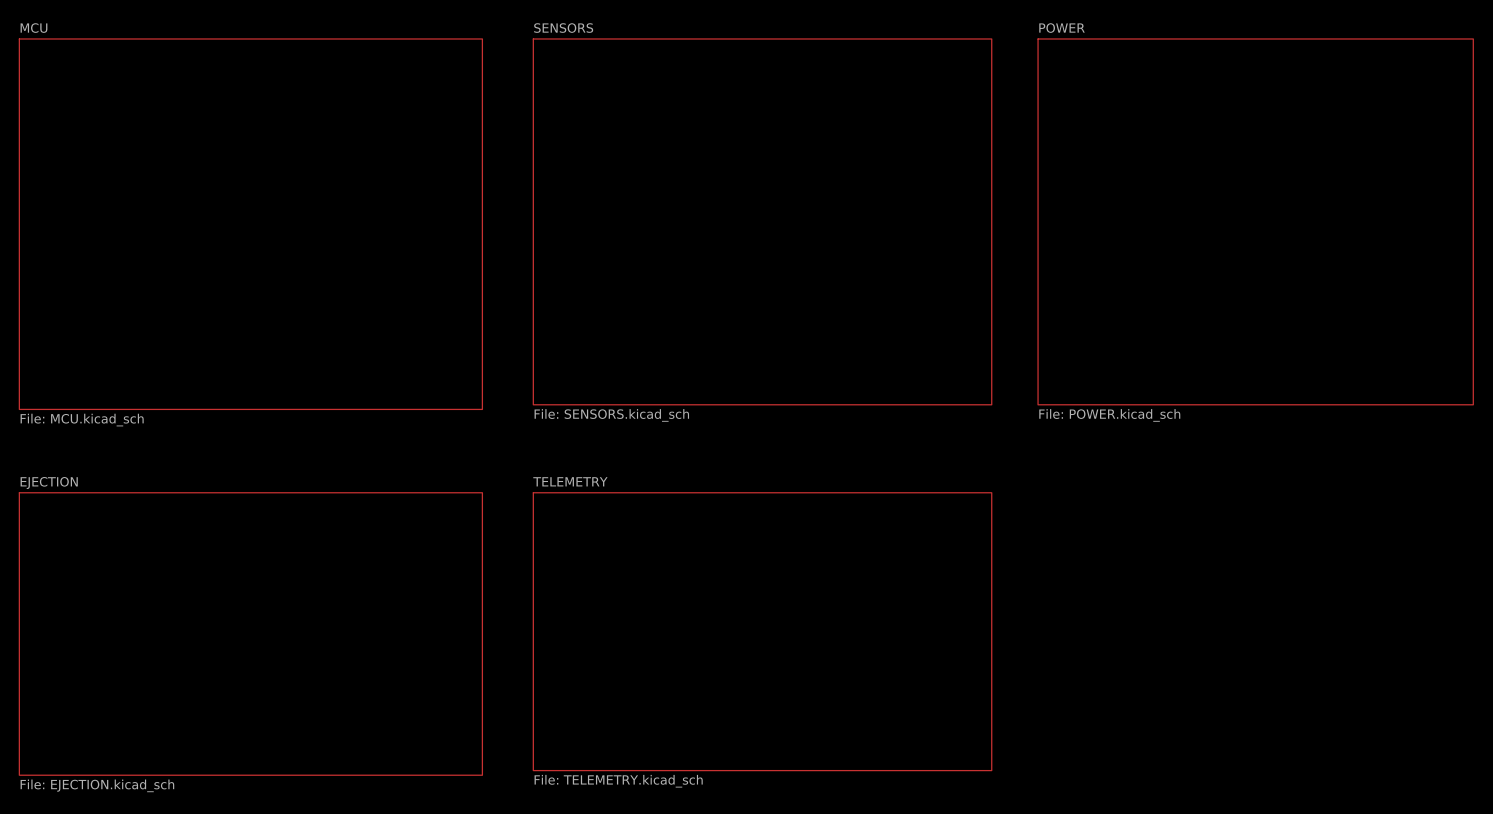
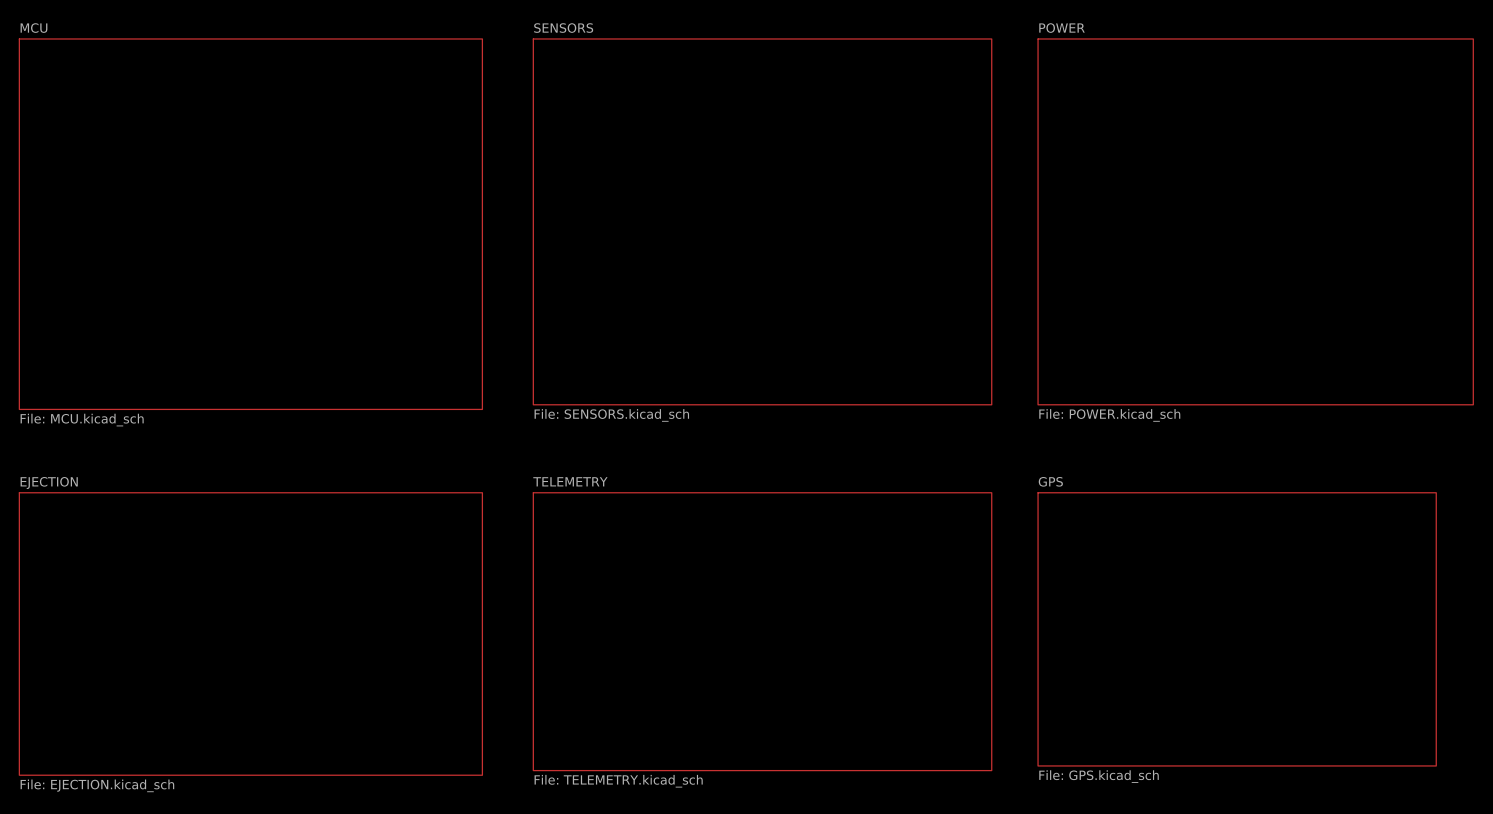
sheet GPS: none -> File: GPS.kicad_sch (1237, 629)

